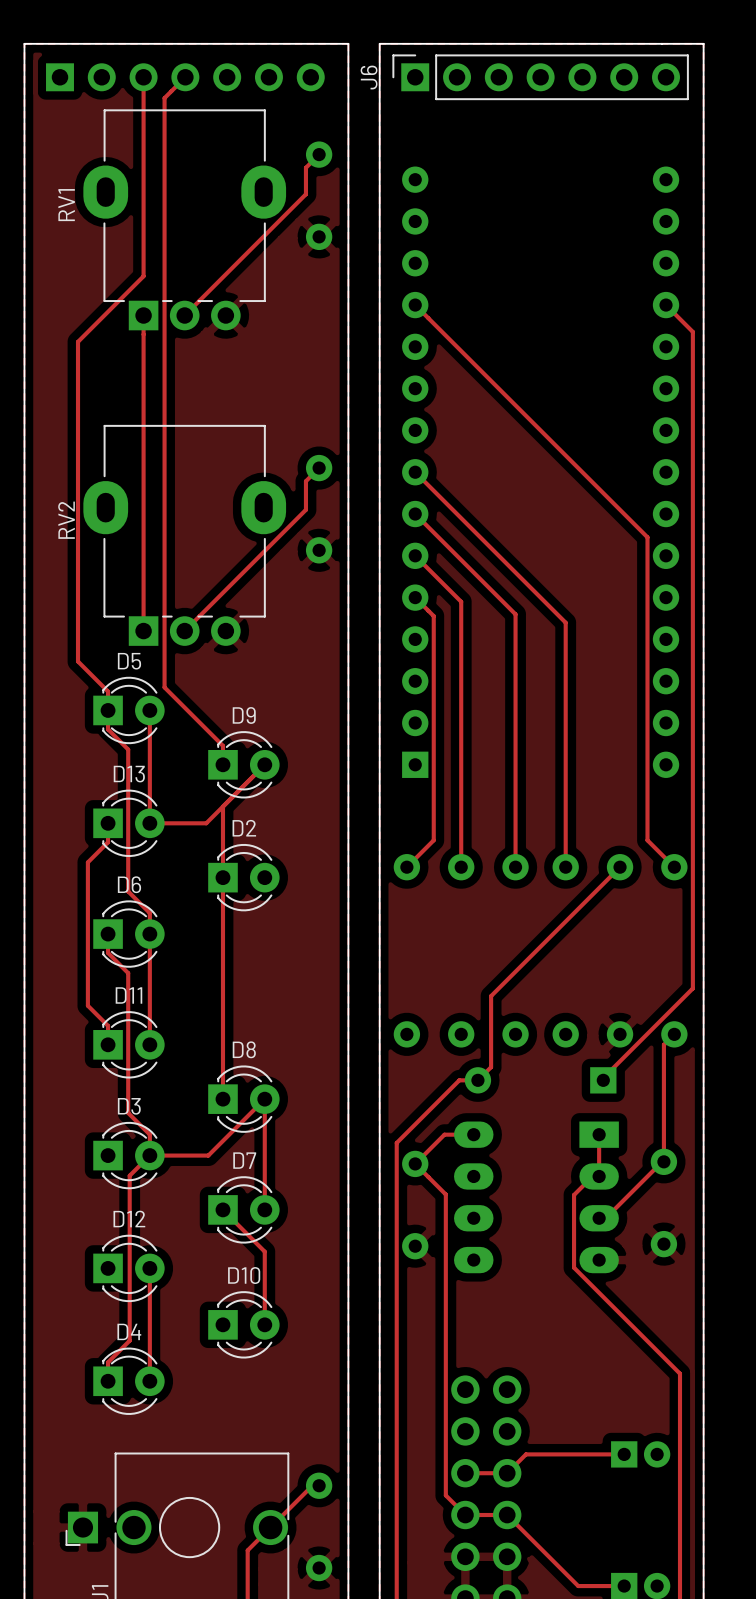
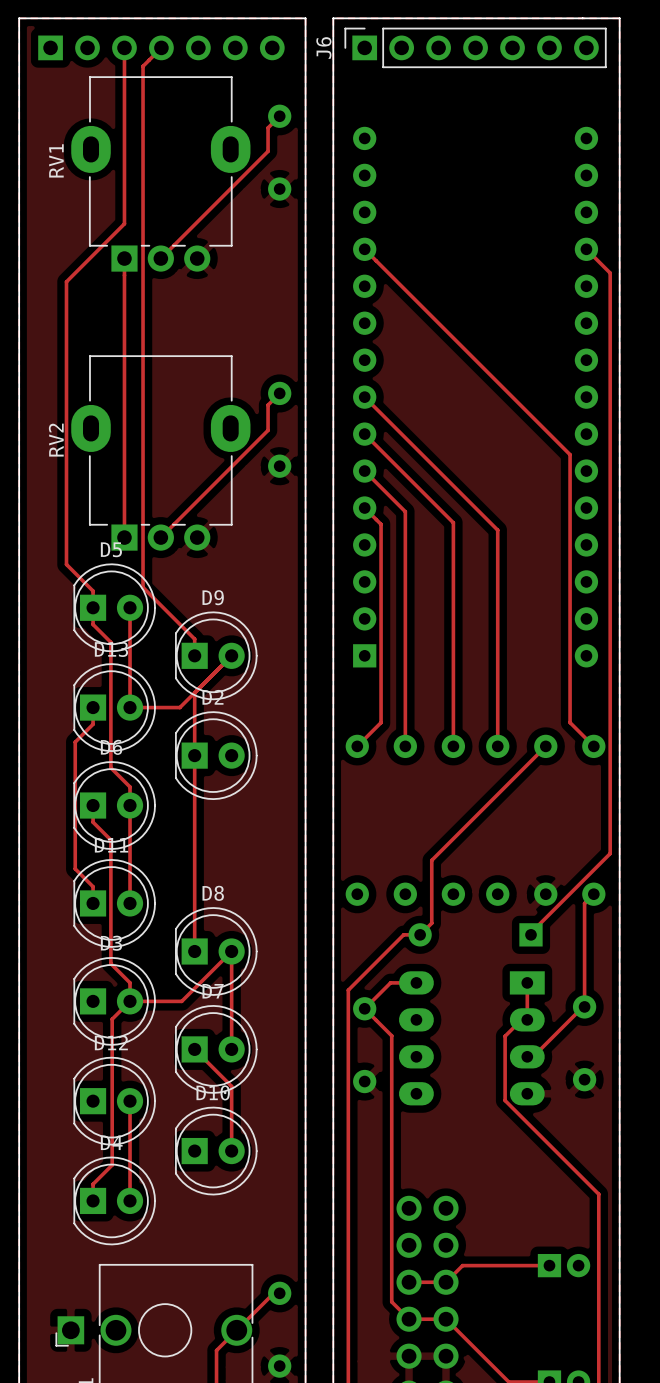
D5 footprint: [93, 676, 165, 745] -> [73, 563, 156, 653]
D9 footprint: [208, 731, 280, 799] -> [175, 611, 258, 701]
D13 footprint: [93, 789, 165, 858] -> [73, 663, 156, 752]
D2 footprint: [208, 843, 280, 912] -> [175, 711, 258, 800]
D6 footprint: [93, 900, 165, 968] -> [73, 761, 156, 850]
D11 footprint: [93, 1011, 165, 1079] -> [73, 859, 156, 948]
D8 footprint: [208, 1065, 280, 1133] -> [175, 907, 258, 996]
D3 footprint: [93, 1121, 165, 1190] -> [73, 957, 156, 1046]
D7 footprint: [208, 1176, 280, 1244] -> [175, 1005, 258, 1094]
D12 footprint: [93, 1234, 165, 1303] -> [73, 1056, 156, 1146]
D10 footprint: [208, 1291, 280, 1359] -> [175, 1106, 258, 1196]
D4 footprint: [93, 1347, 165, 1415] -> [73, 1156, 156, 1246]

